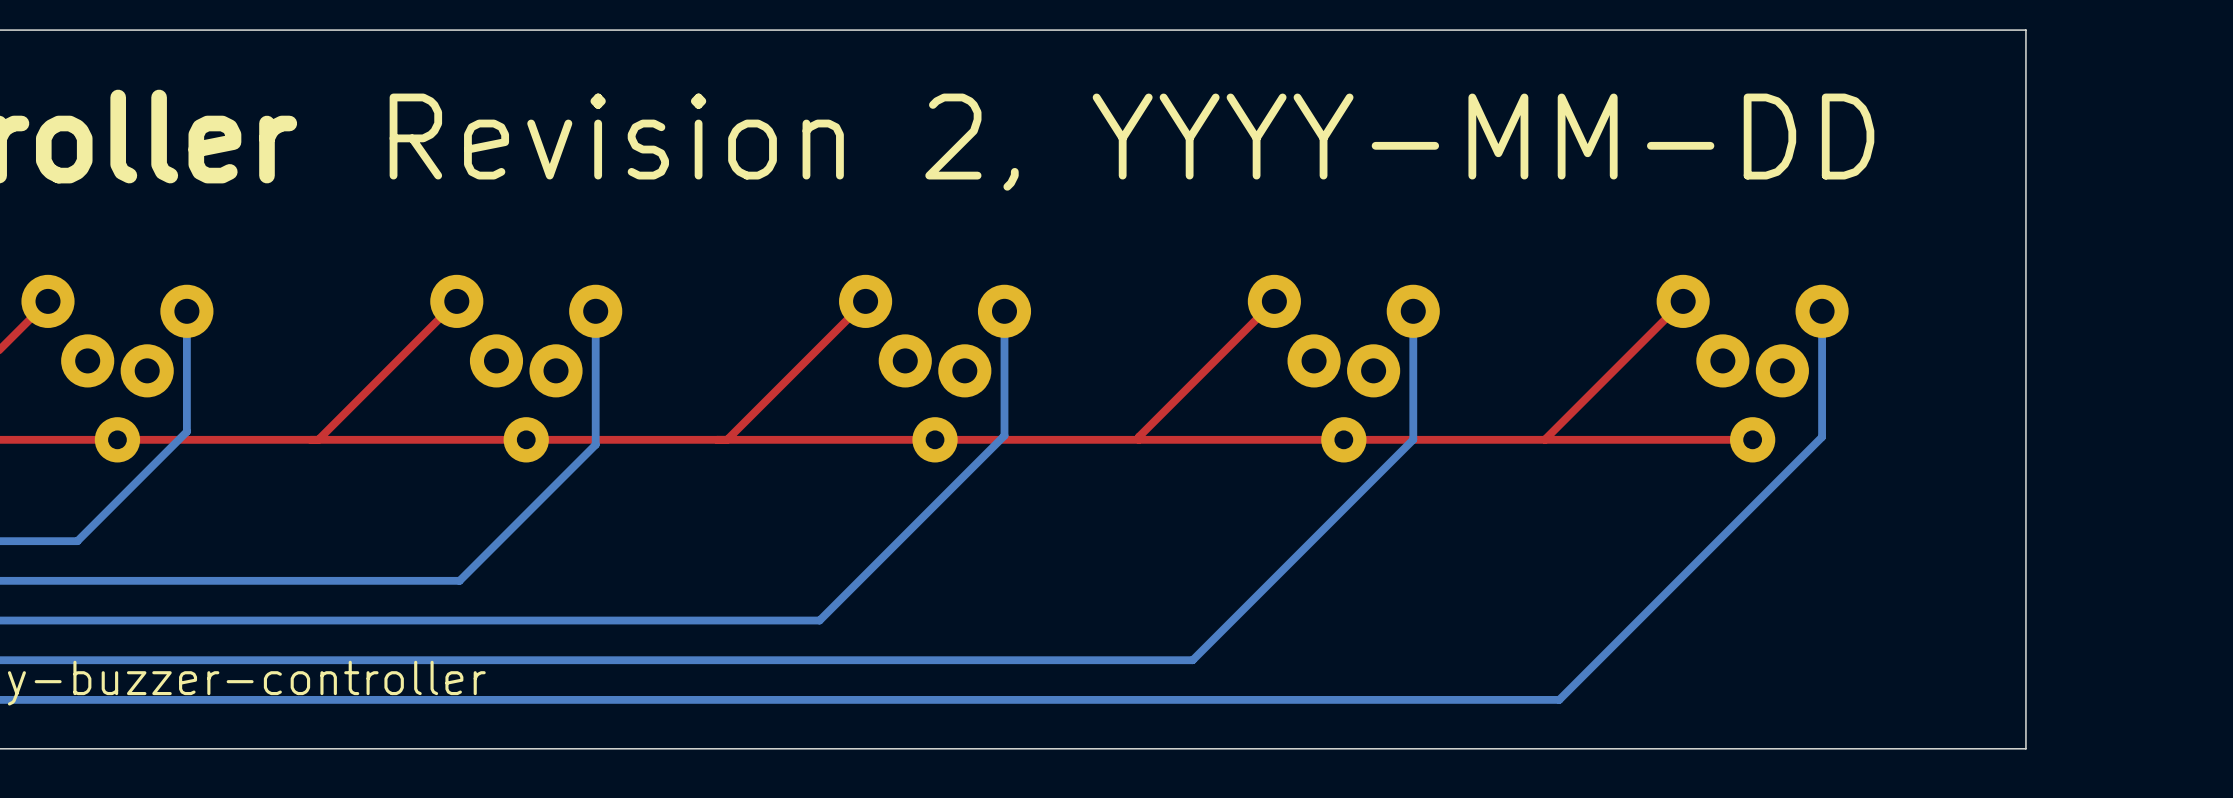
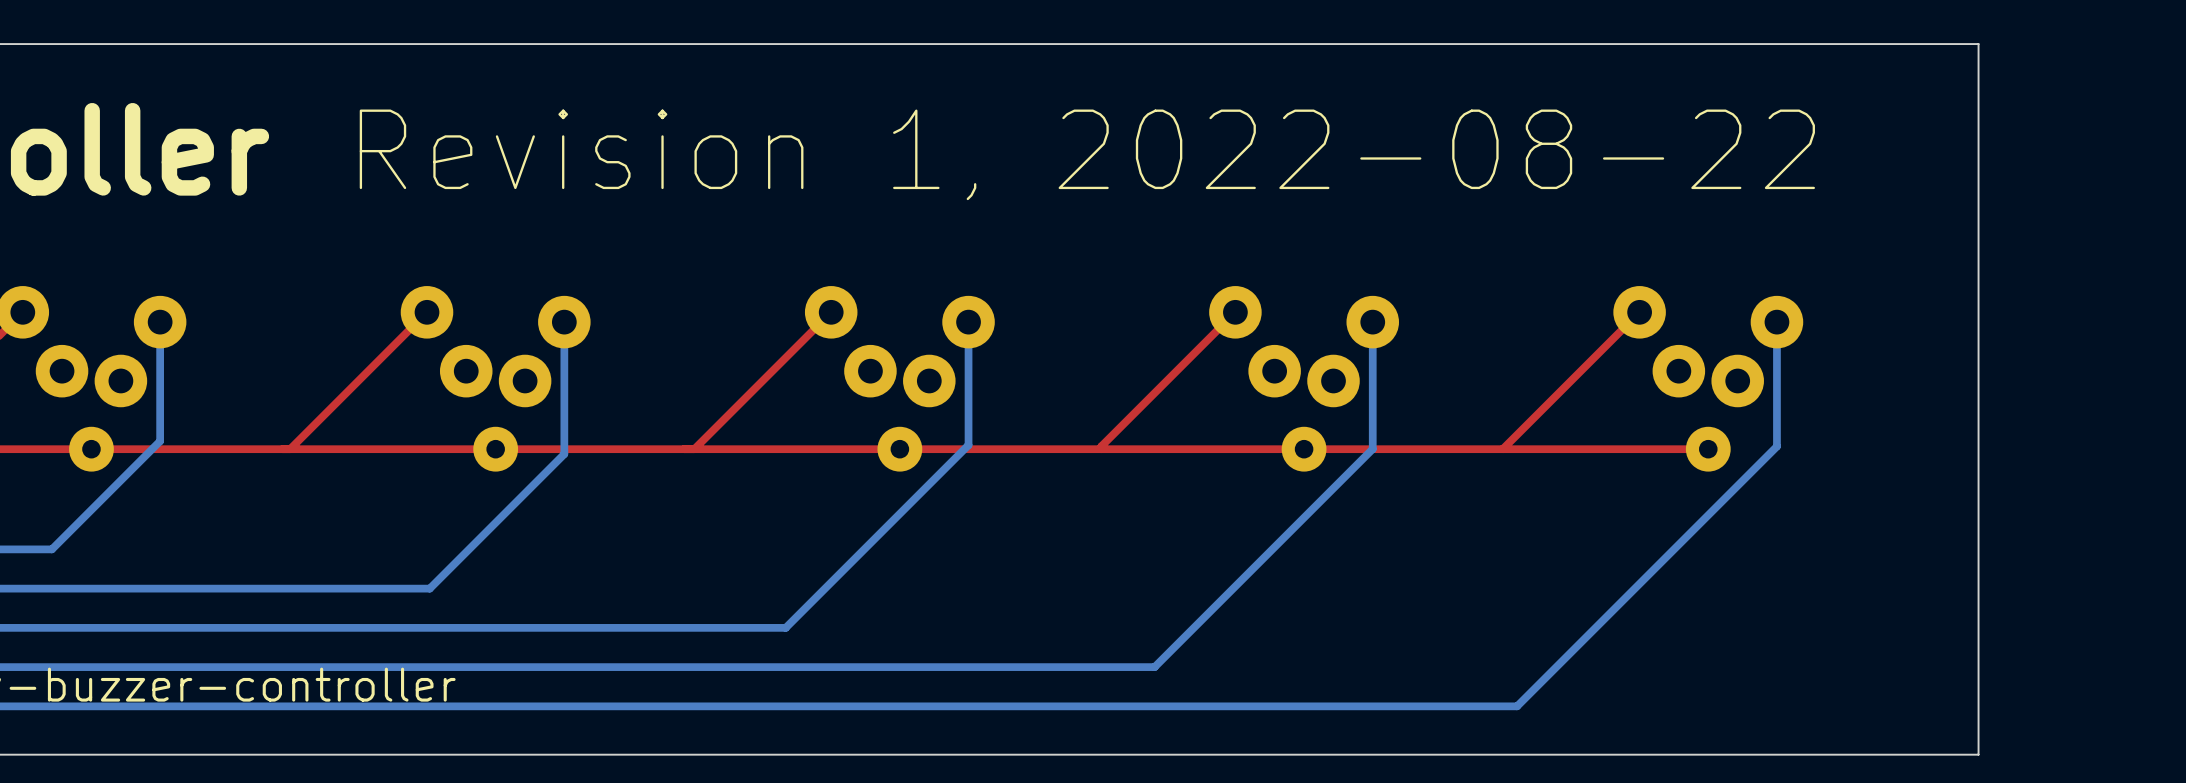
text: Revision 2, YYYY-MM-DD (1131, 142) -> Revision 1, 2022-08-22 (1087, 154)

